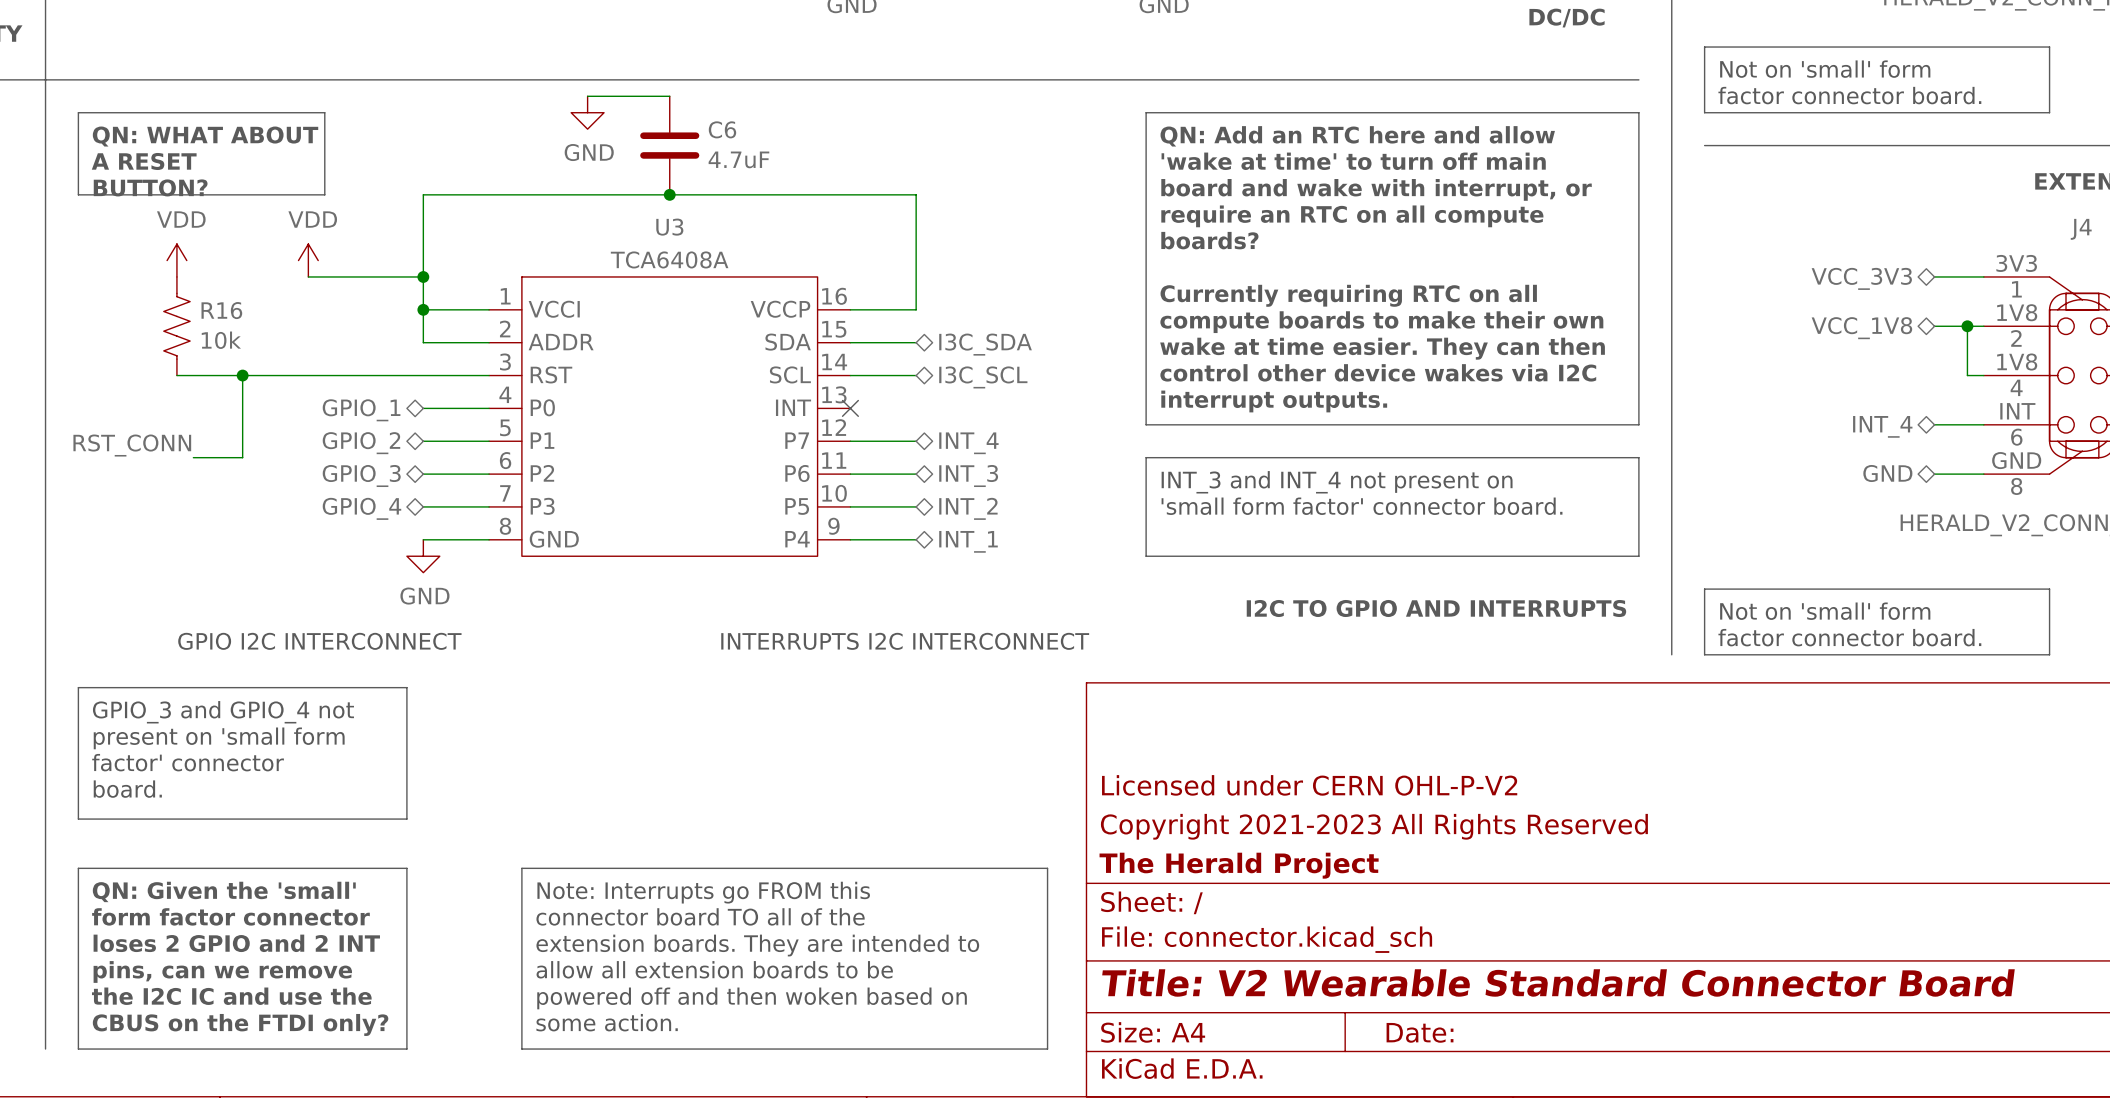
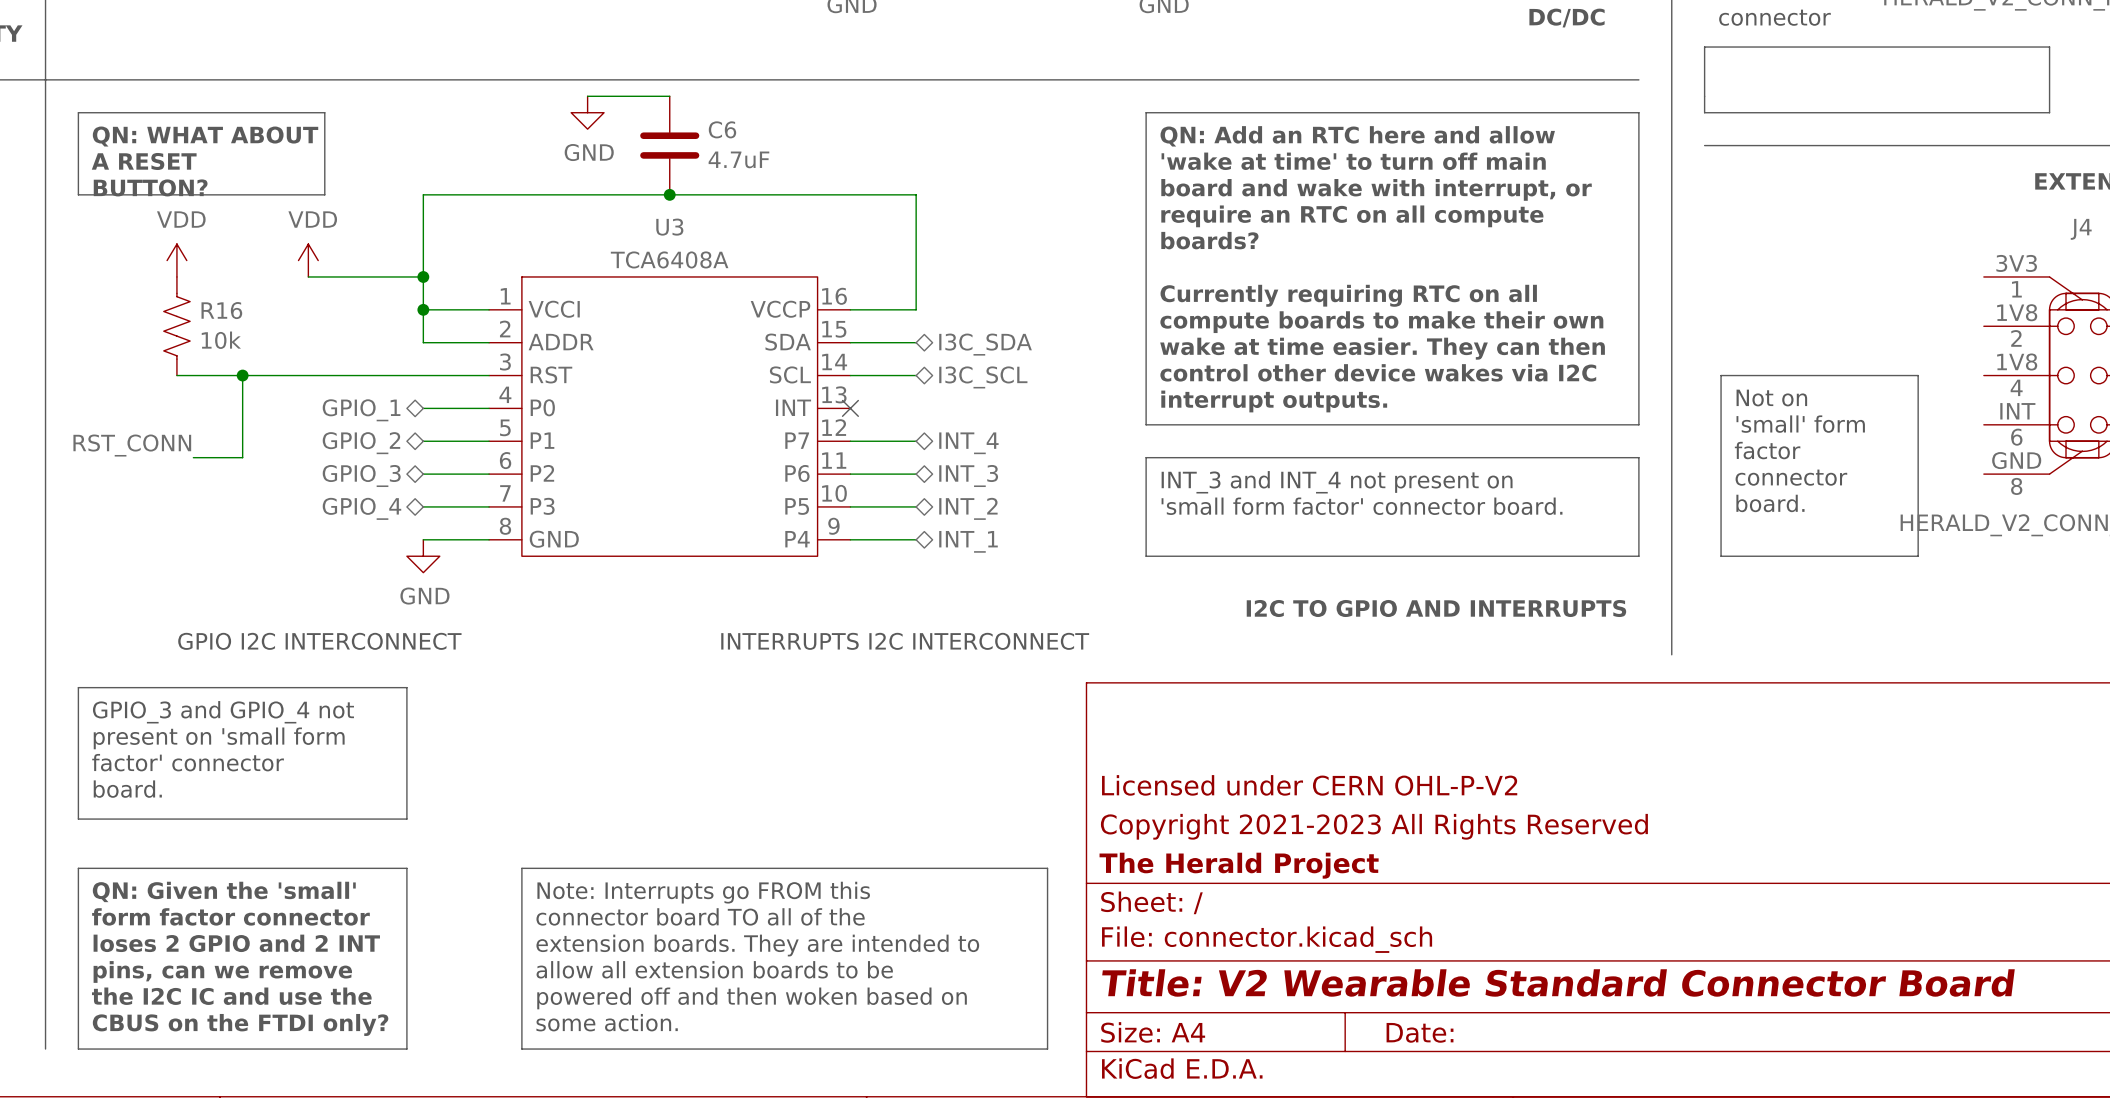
text: none -> connector (1774, 17)
text: Not on 'small' form (1825, 69) -> none
text: factor connector board. (1849, 95) -> none
wire: (1934, 276) (1983, 276) -> none
hierarchical label: VCC_3V3 (1861, 278) -> none
wire: (1934, 326) (1983, 326) -> none
wire: (1967, 326) (1967, 375) (1983, 375) -> none
junction: (1967, 326) -> none
hierarchical label: VCC_1V8 (1861, 328) -> none
line: none -> (1721, 375) (1918, 375) (1918, 556) (1721, 556) (1721, 375)
text: none -> Not on (1771, 398)
text: none -> 'small' form (1800, 424)
wire: (1934, 424) (1983, 424) -> none
hierarchical label: INT_4 (1882, 426) -> none
text: none -> factor (1767, 450)
hierarchical label: GND (1887, 473) -> none
wire: (1934, 474) (1983, 474) -> none
text: none -> connector (1791, 477)
text: none -> board. (1770, 503)
line: (1704, 589) (2049, 589) (2049, 654) (1704, 654) (1704, 589) -> none
text: Not on 'small' form (1825, 611) -> none
text: factor connector board. (1849, 637) -> none

